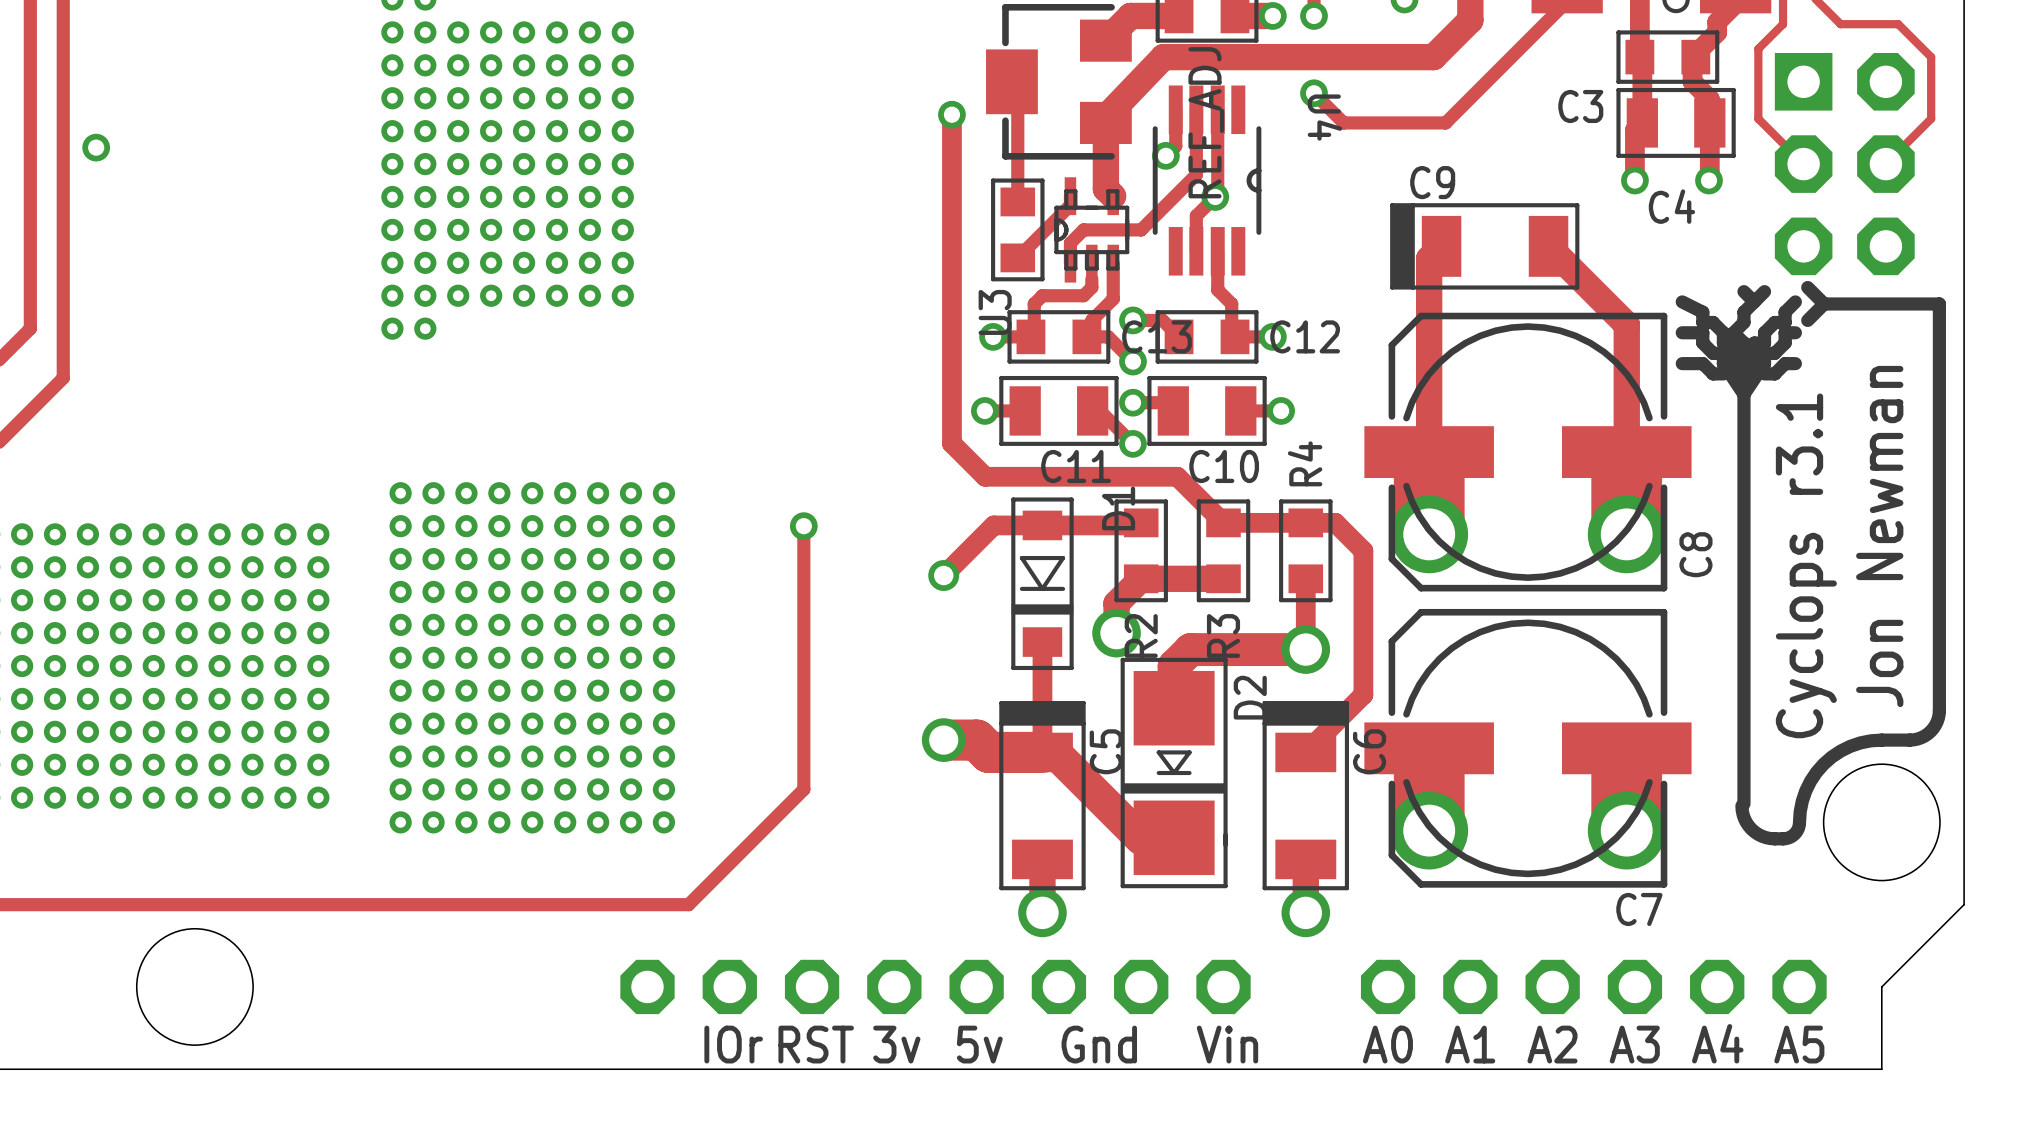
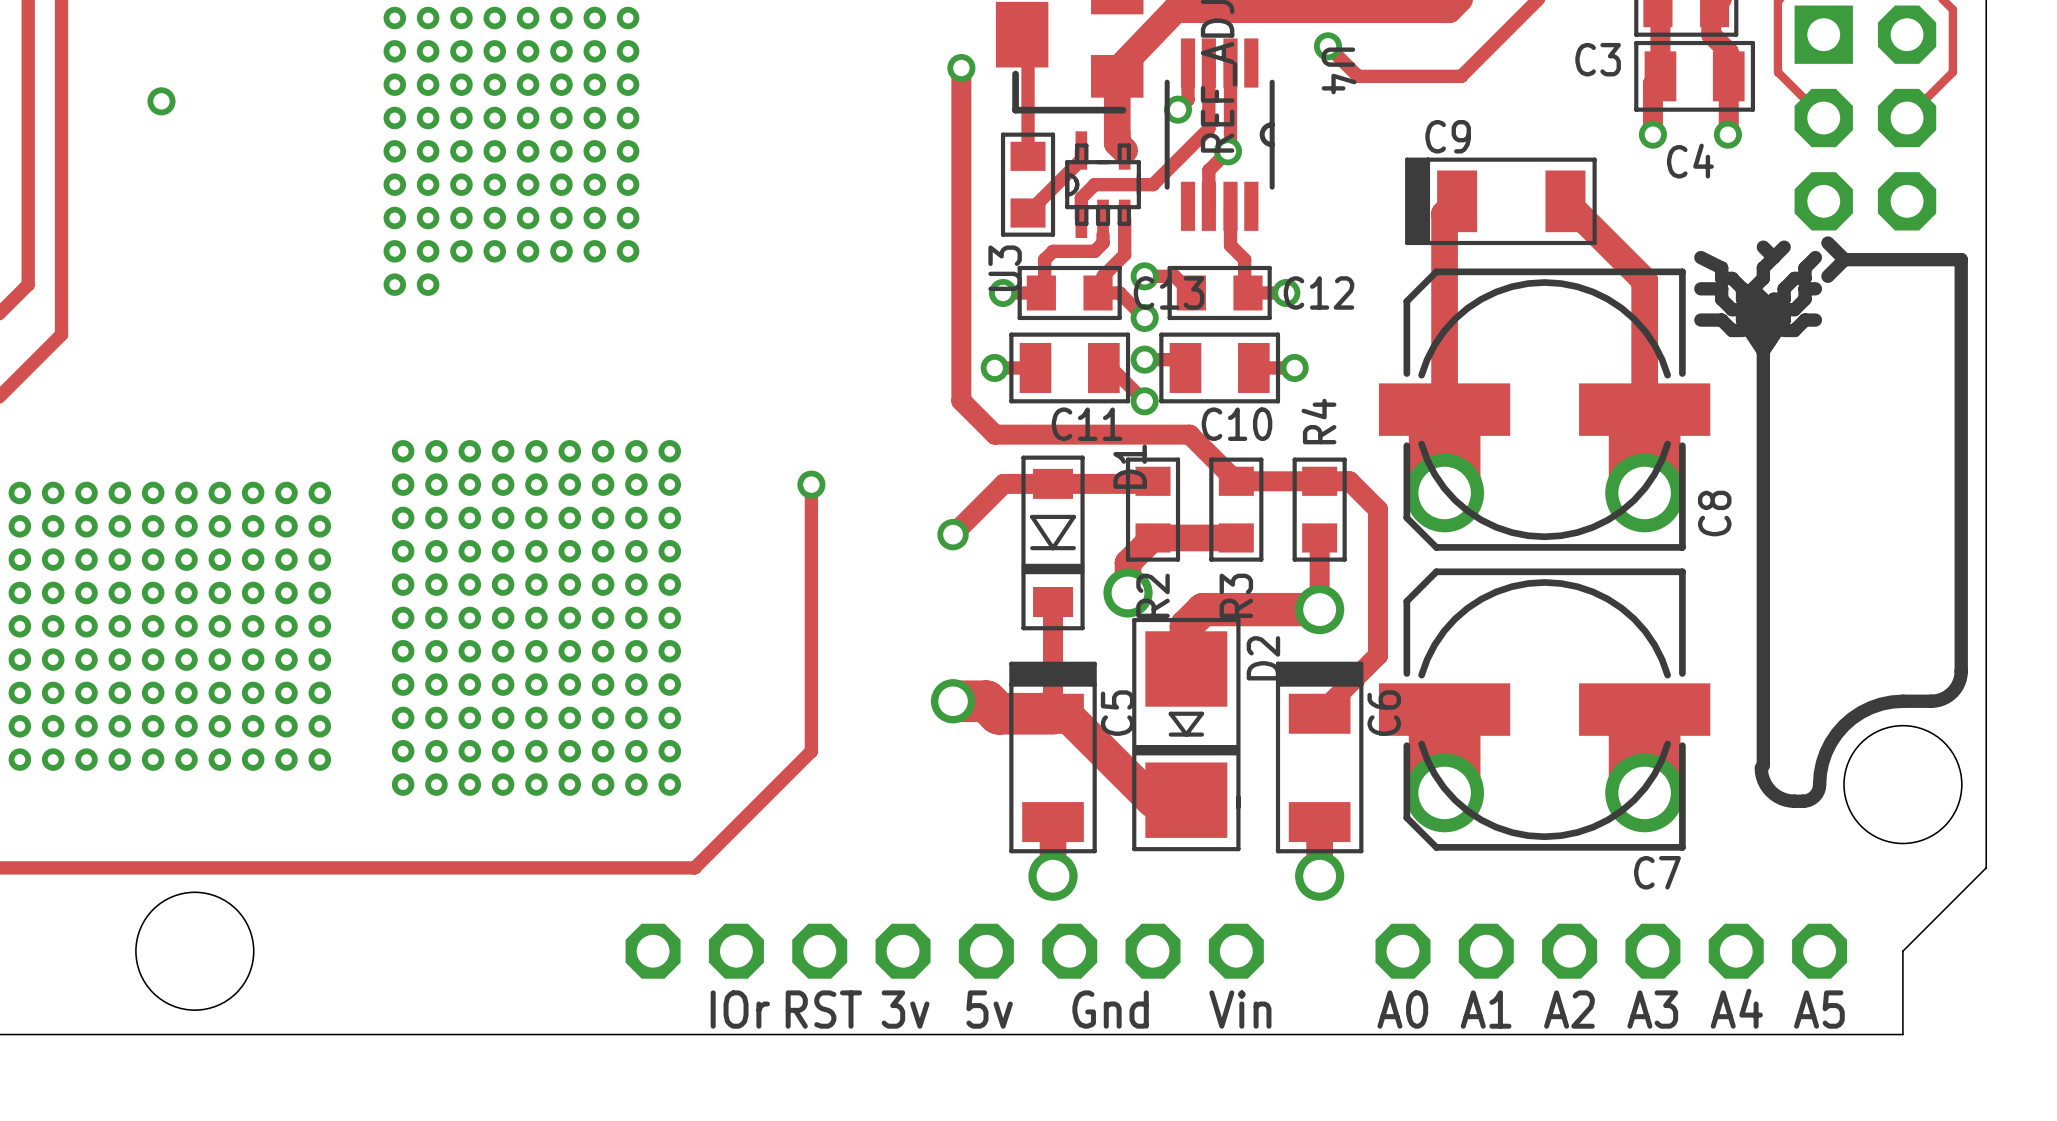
via position: (96, 147) -> (161, 101)
text: Jon Newman (1879, 536) -> none
text: Cyclops r3.1 (1806, 565) -> none

